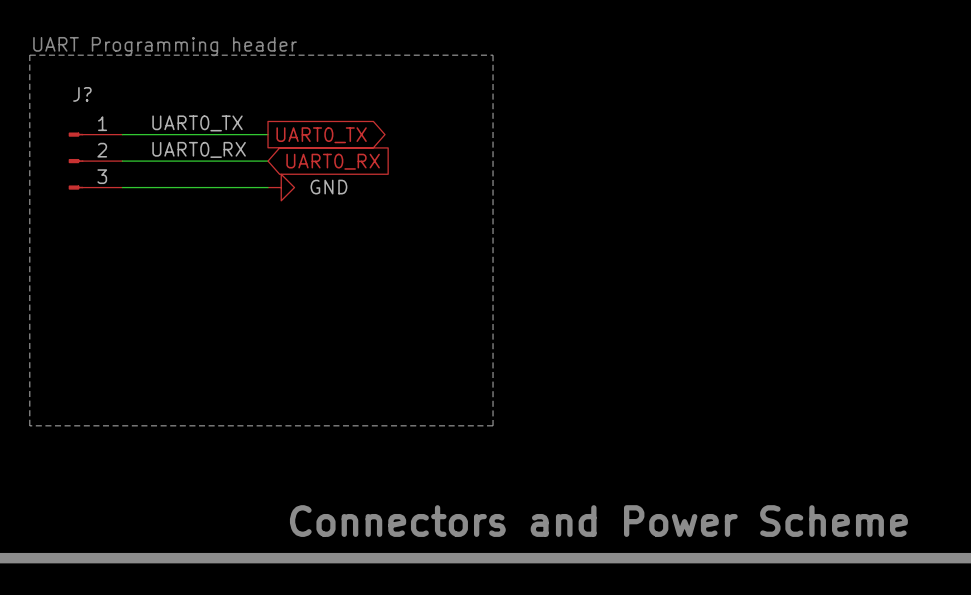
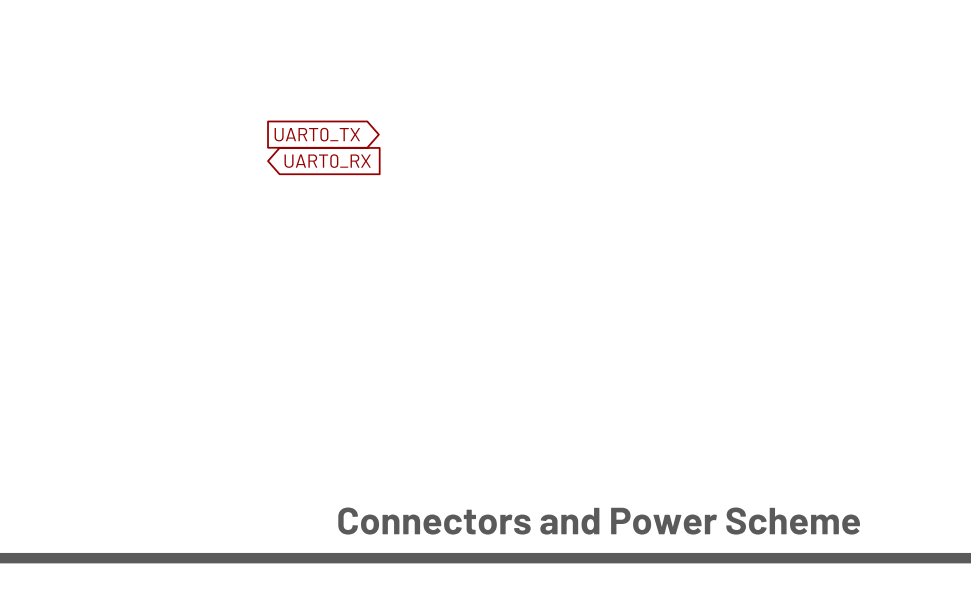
text: UART Programming header (165, 46) -> none
line: (29, 55) (493, 55) (493, 425) (29, 425) (29, 55) -> none
label: UART0_TX (197, 123) -> none
wire: (122, 134) (268, 134) -> none
label: UART0_RX (199, 149) -> none
J?: (95, 161) -> none
wire: (122, 161) (268, 161) -> none
wire: (122, 187) (268, 187) -> none
power symbol: GND (281, 187) -> none

